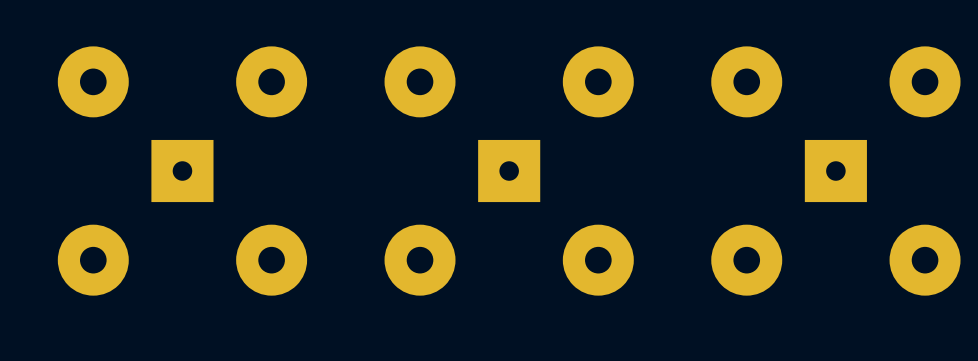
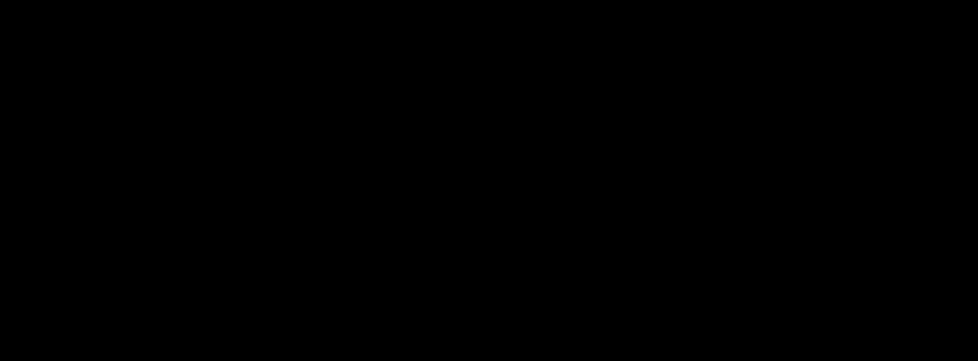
part: (182, 171) -> none
part: (509, 171) -> none
part: (835, 171) -> none

